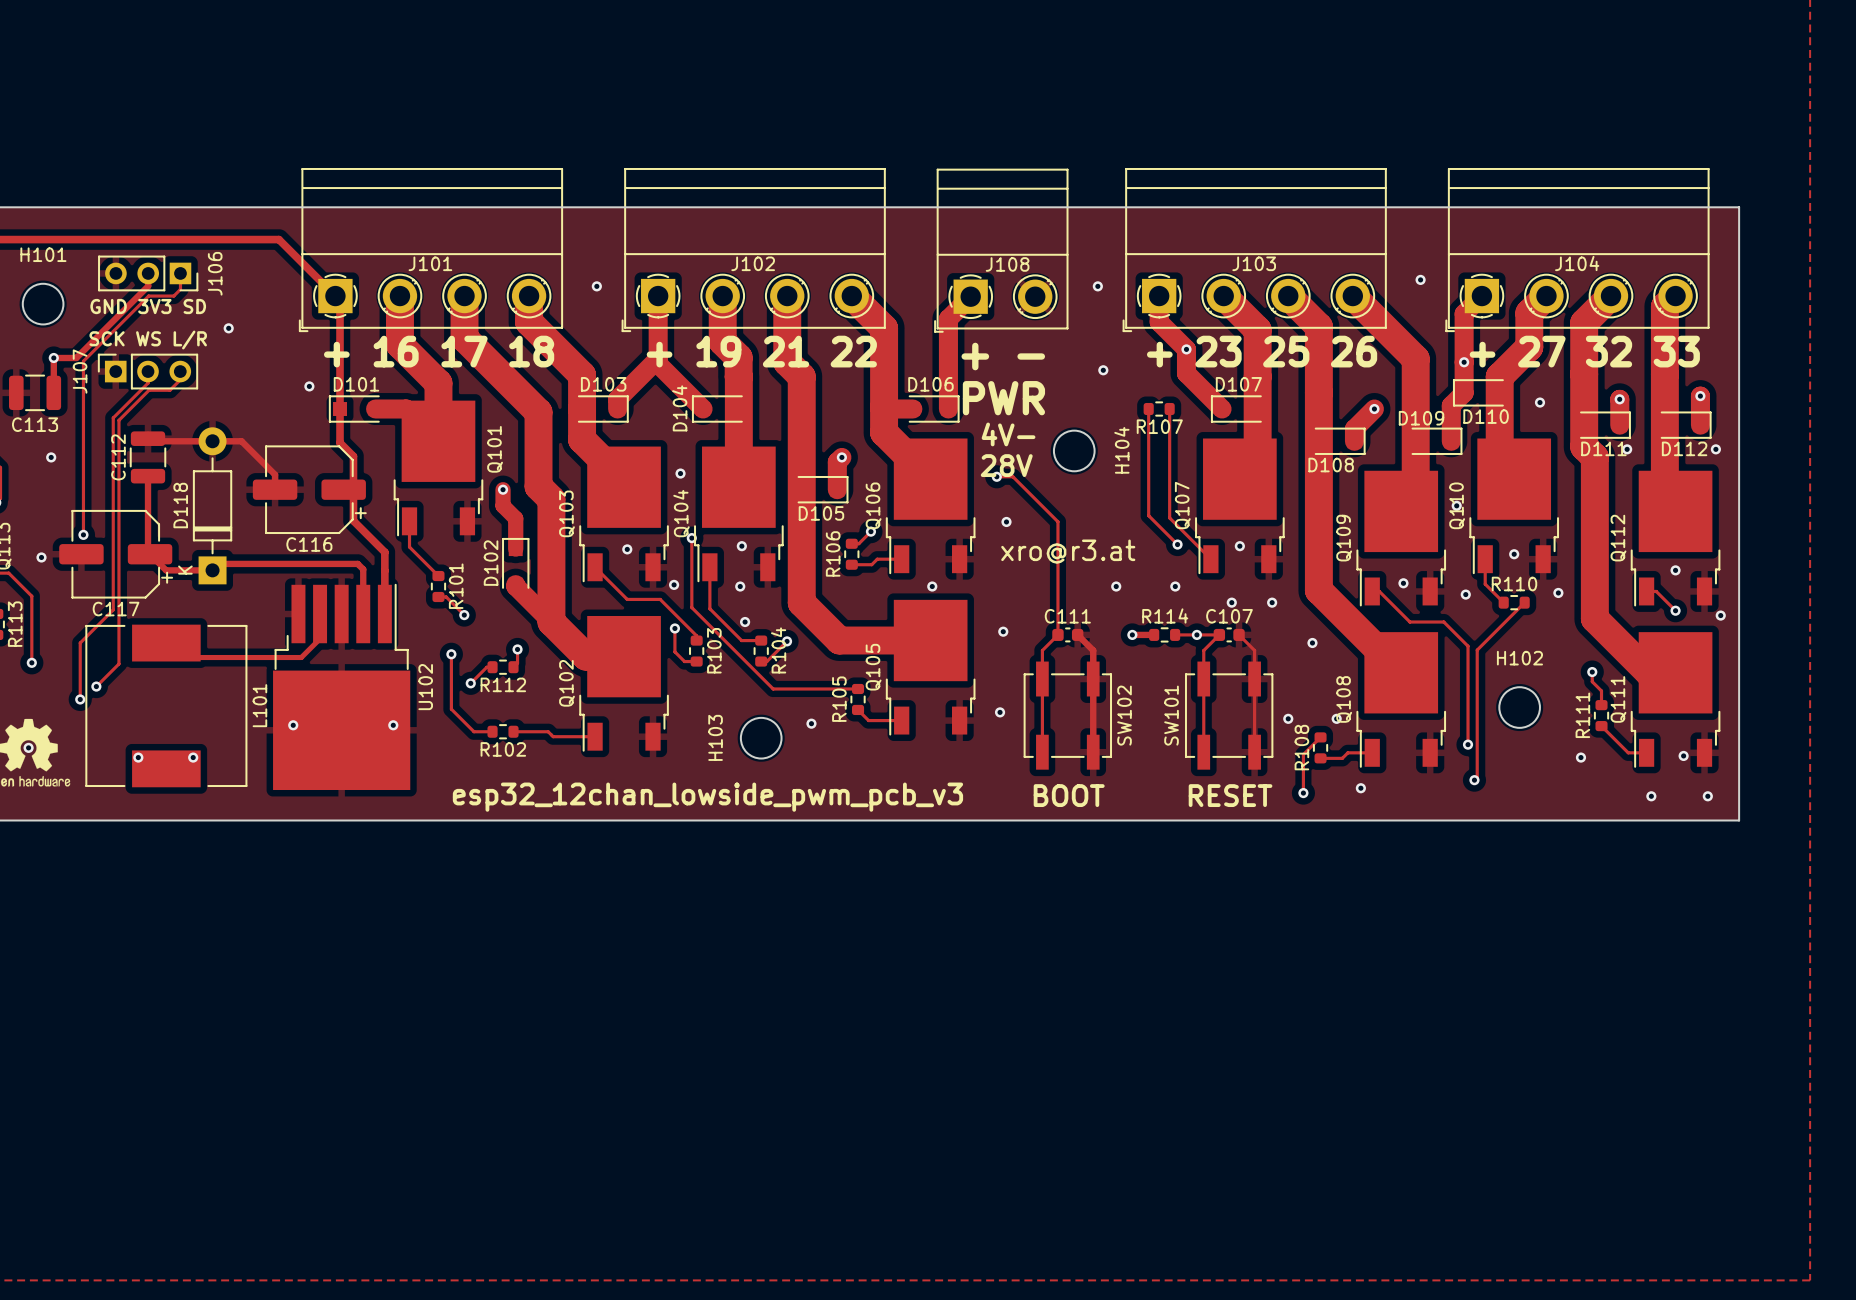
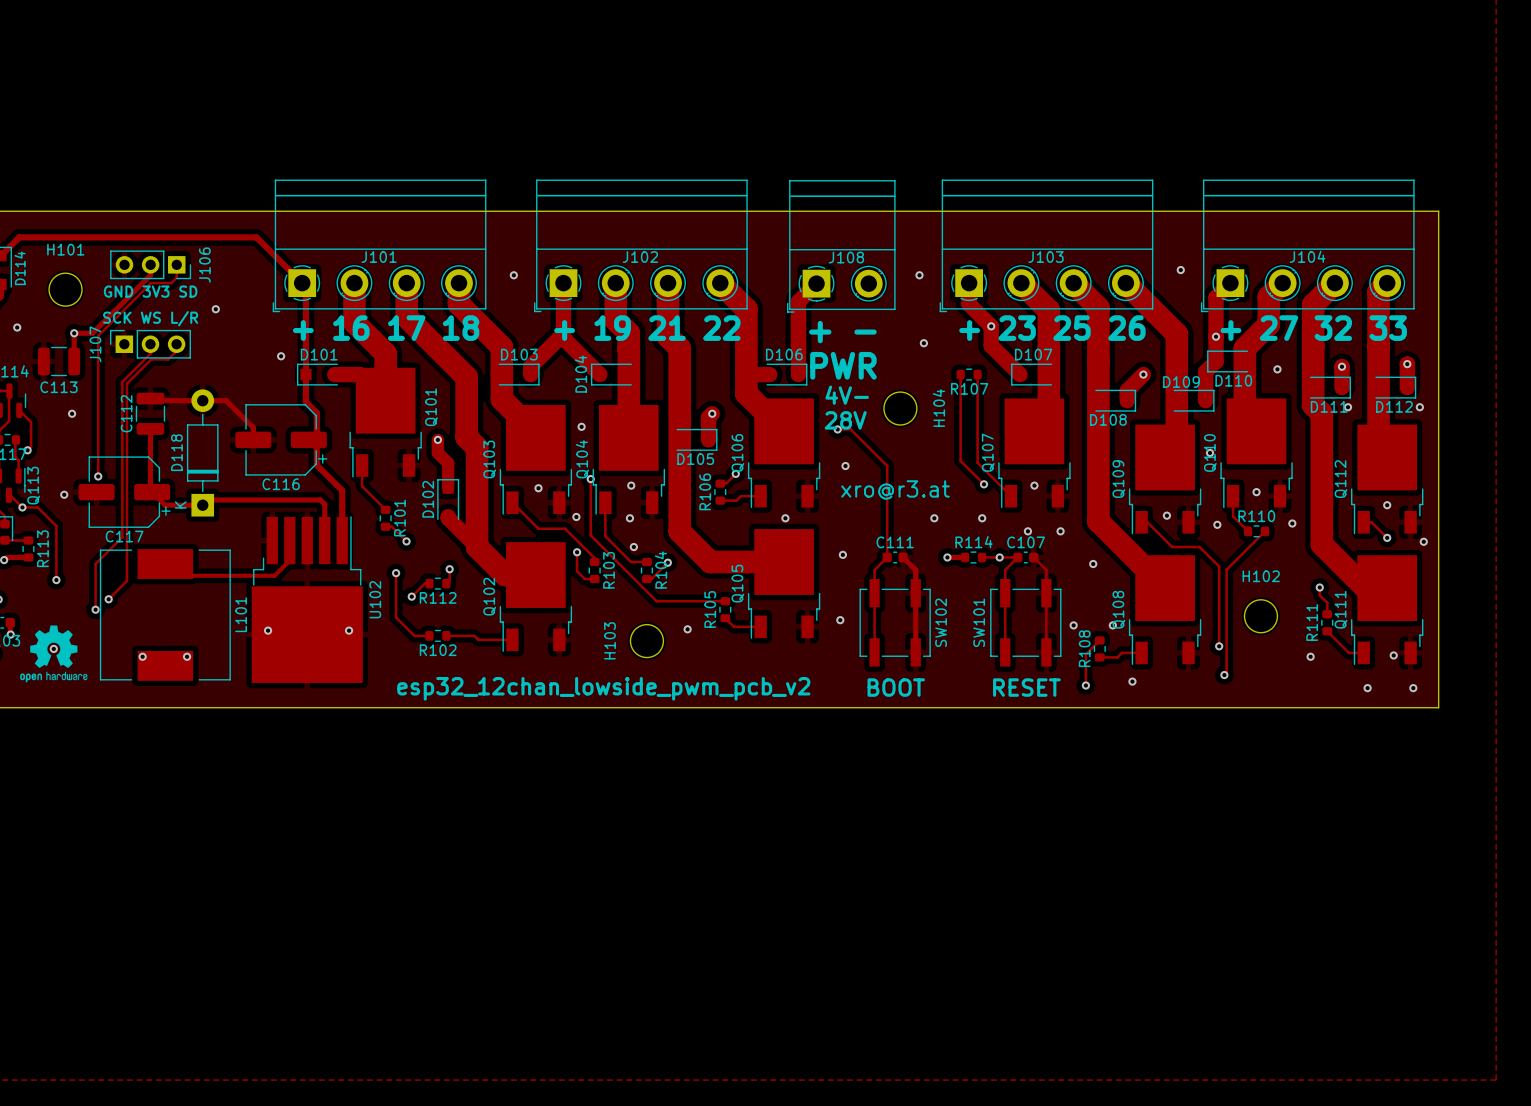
text: esp32_12chan_lowside_pwm_pcb_v3 (707, 797) -> esp32_12chan_lowside_pwm_pcb_v2 (603, 688)

